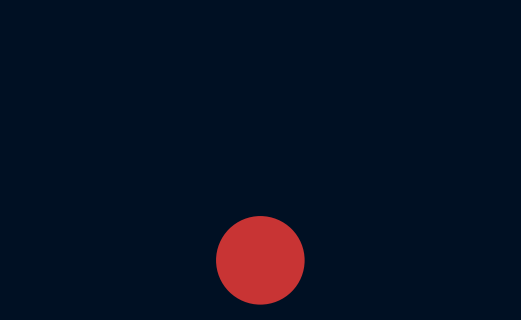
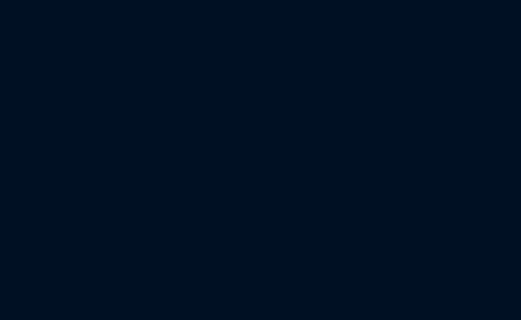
part: (260, 260) -> none

